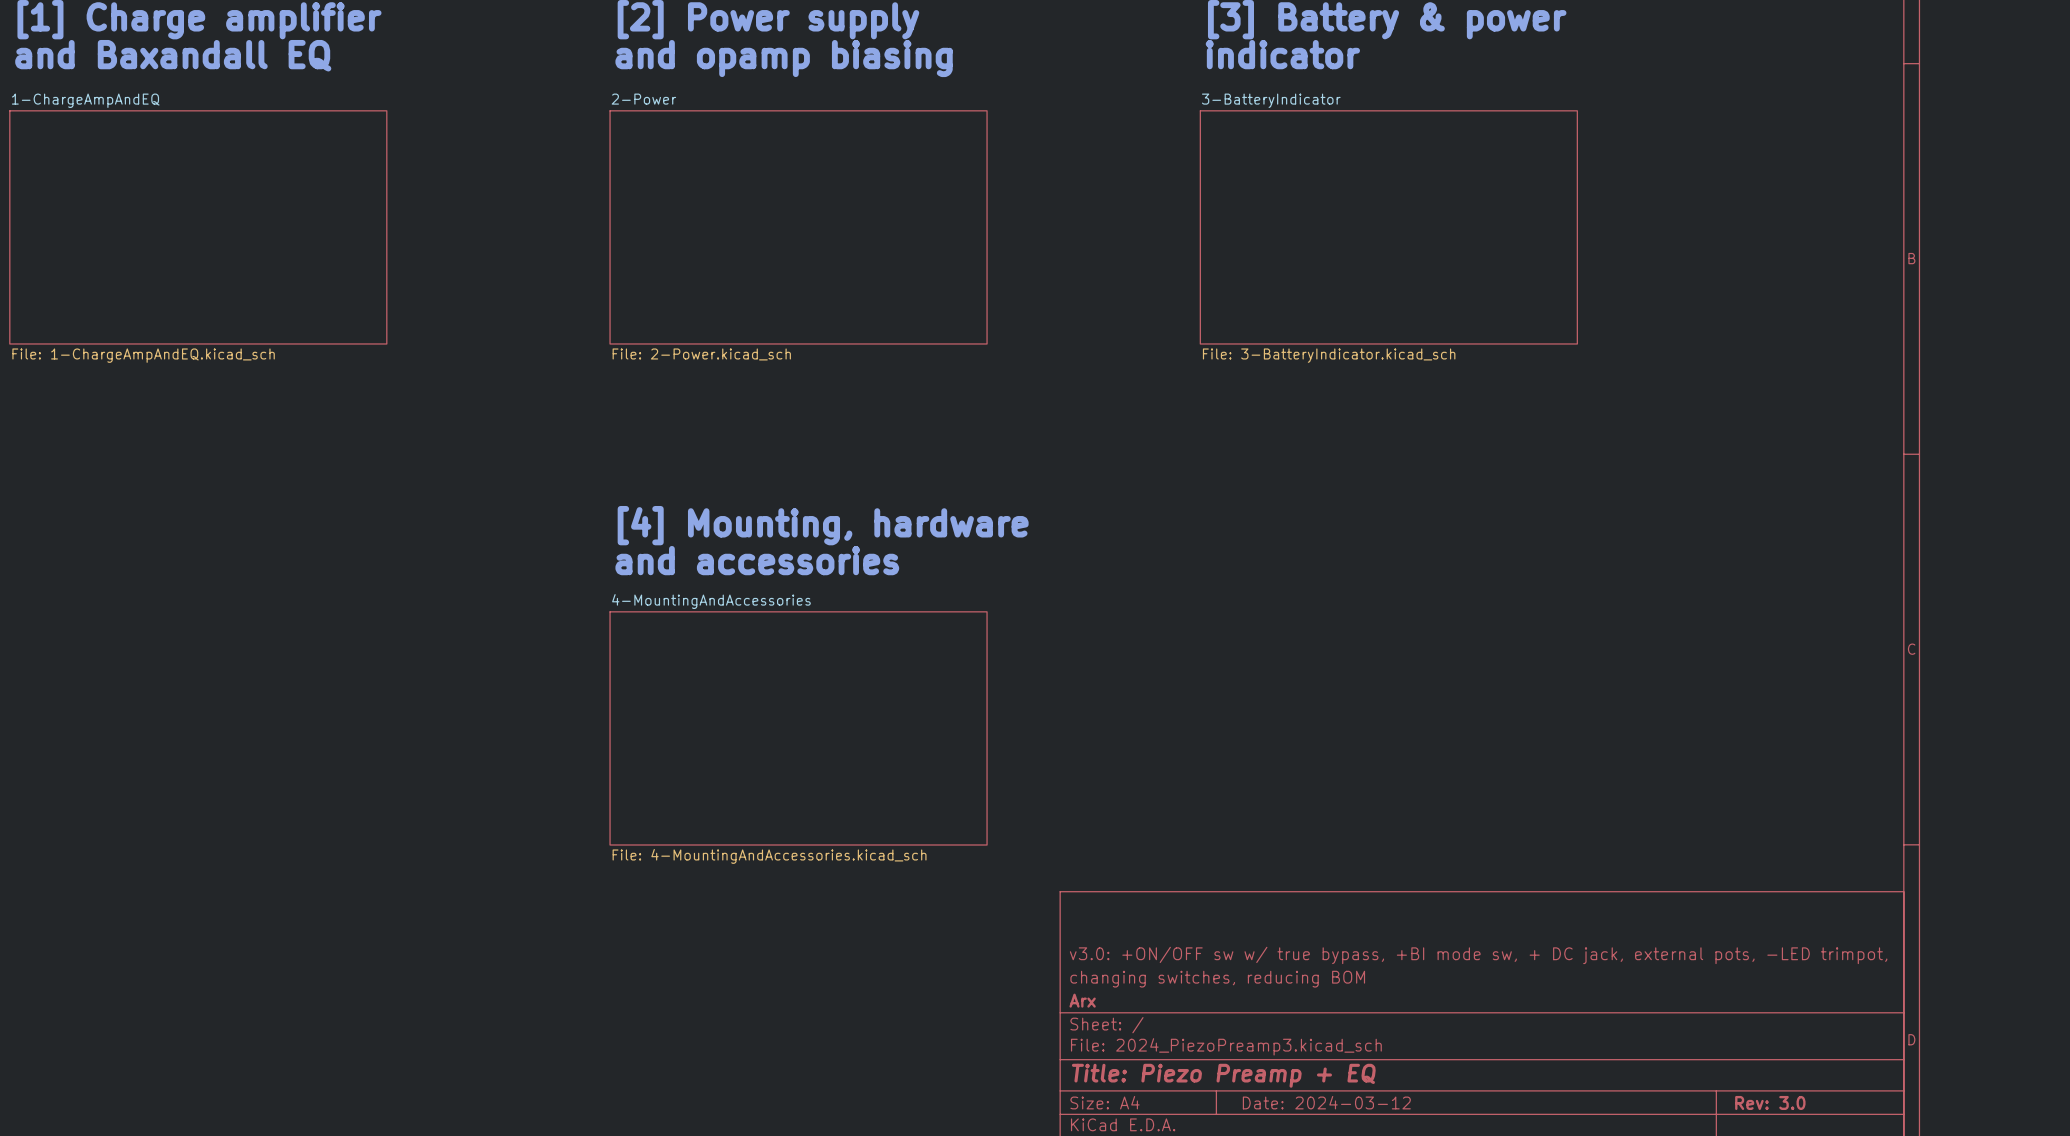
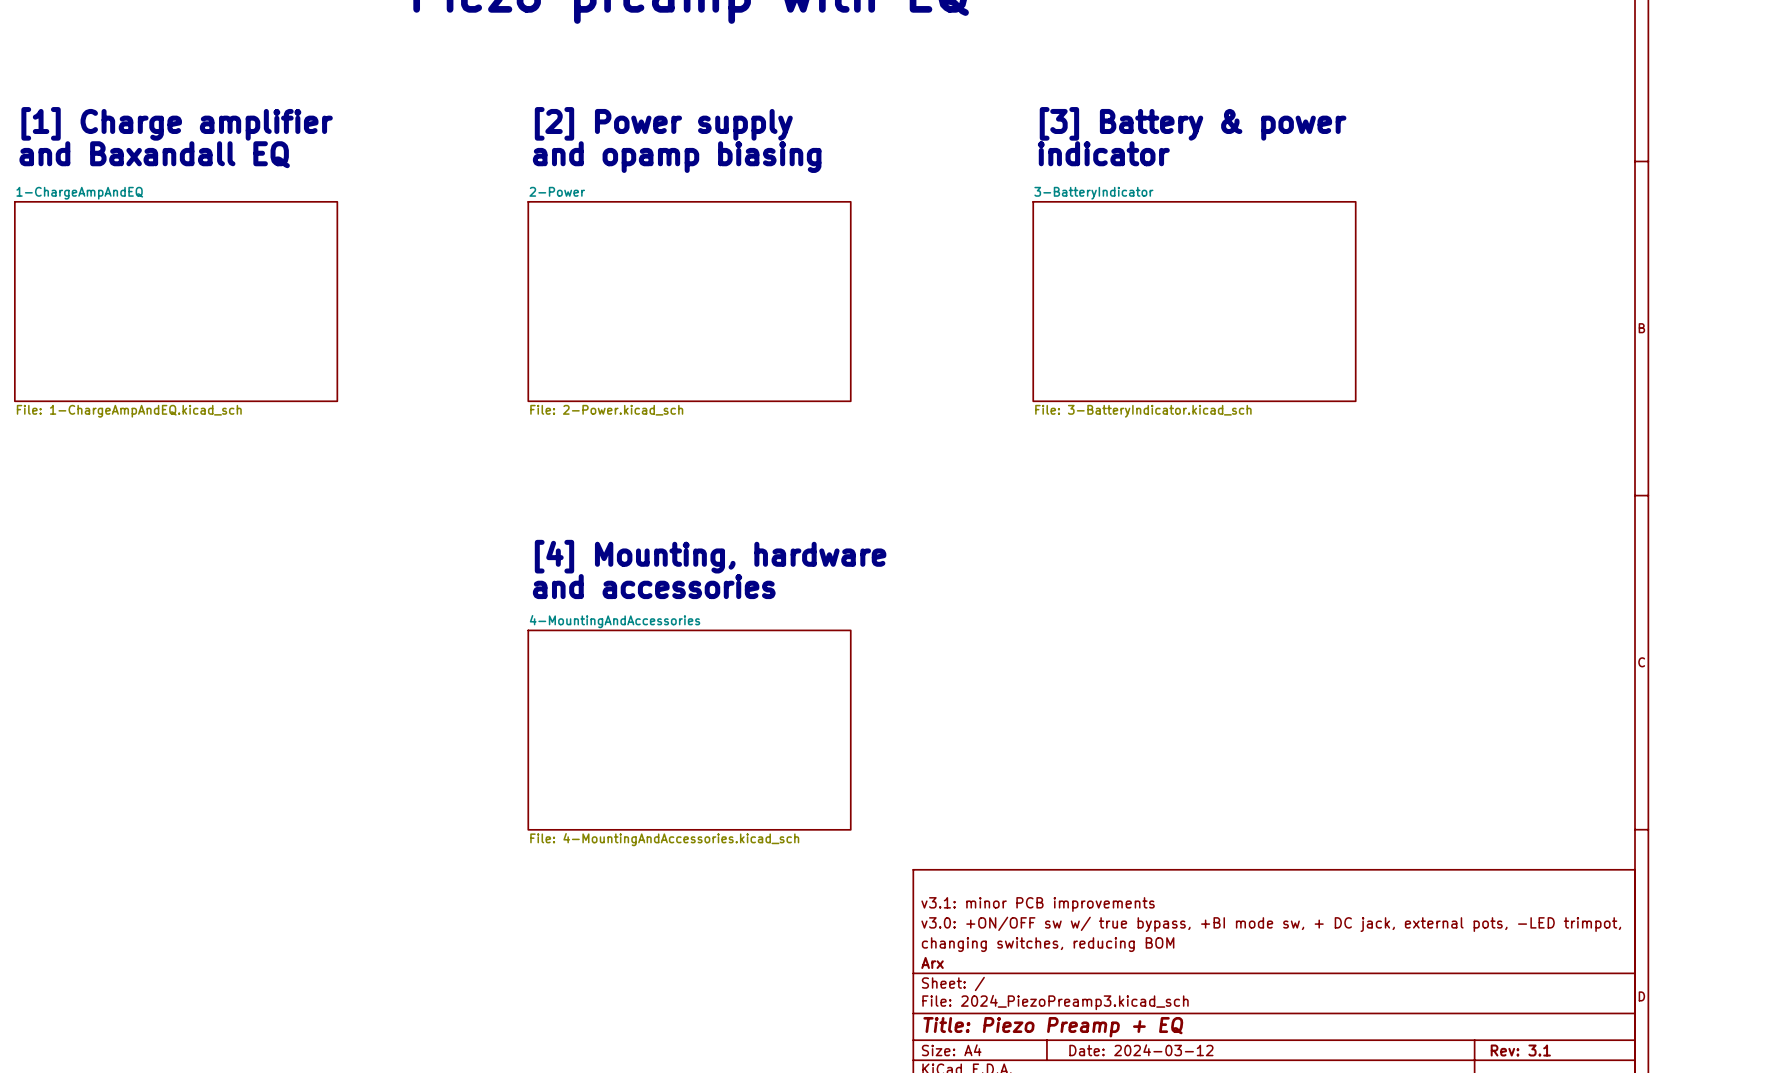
title block: none -> v3.1: minor PCB improvements (1038, 904)
title block: Rev: 3.0 (1770, 1102) -> Rev: 3.1 (1520, 1050)

